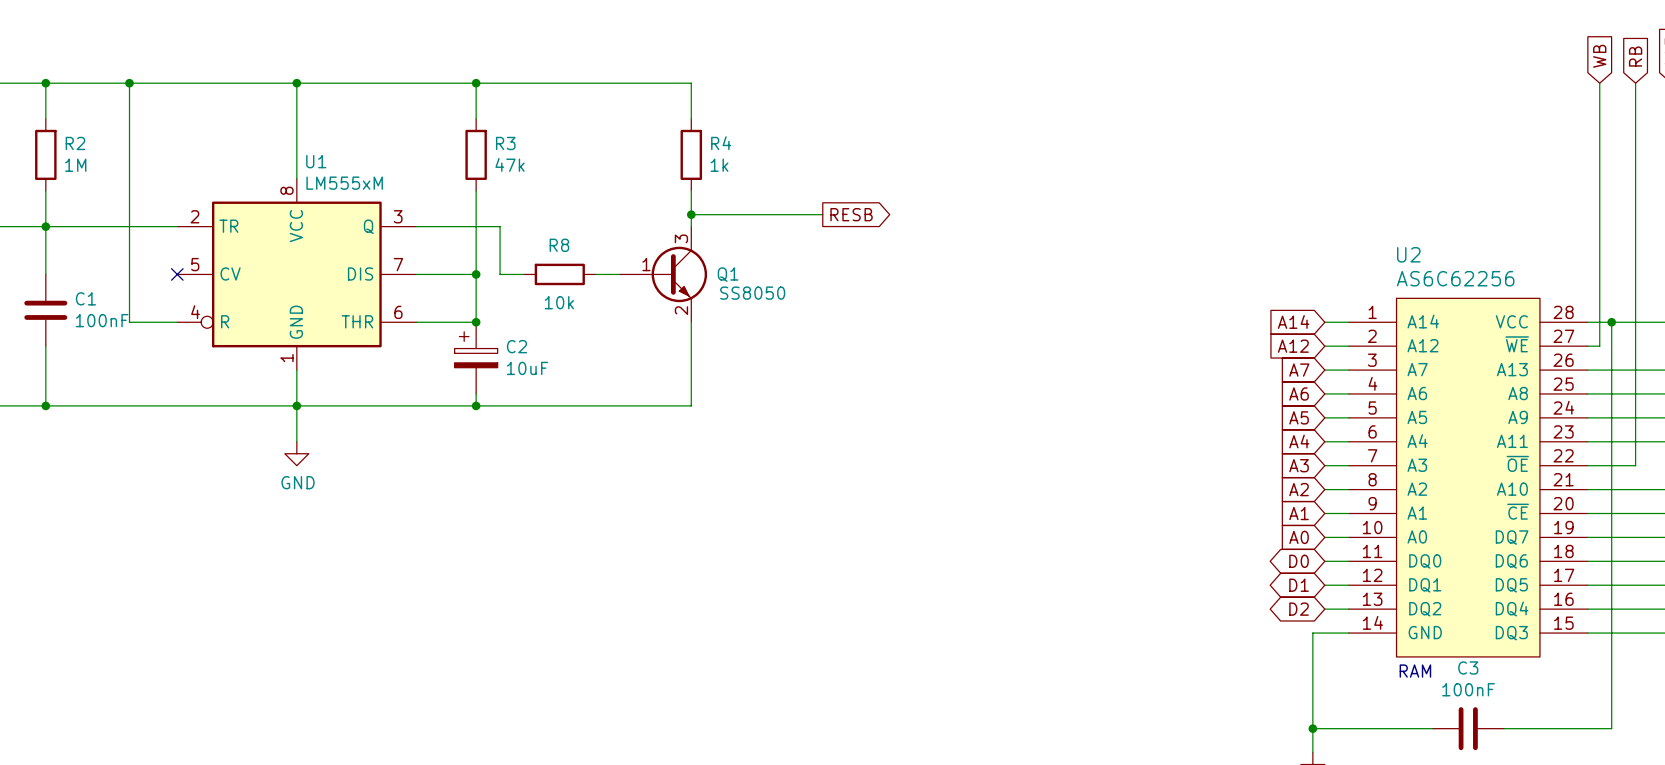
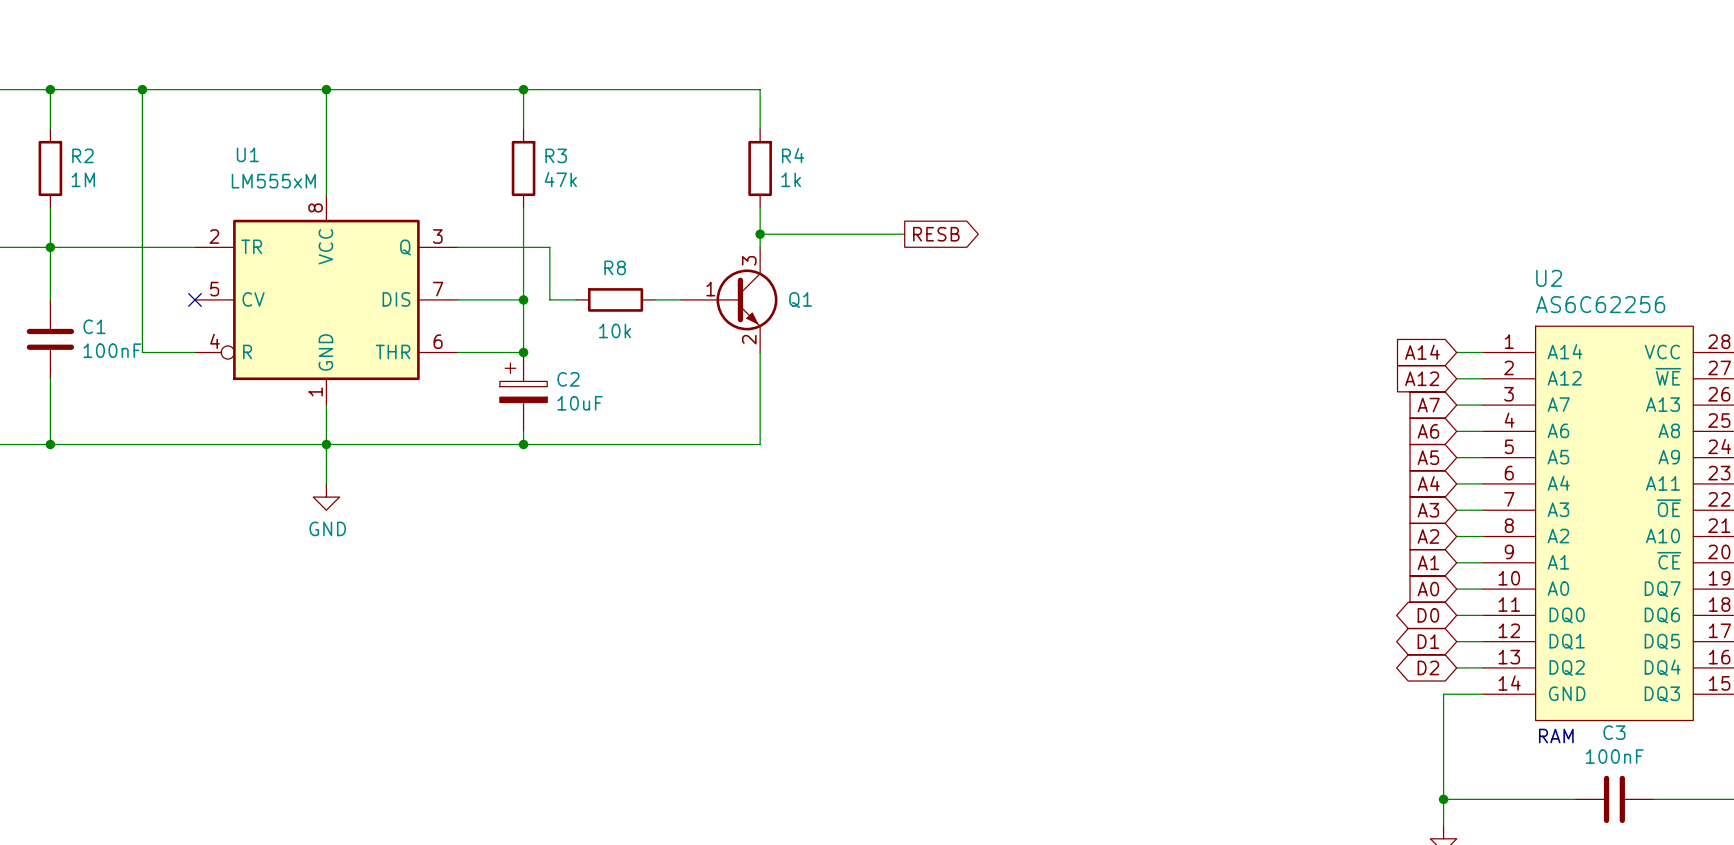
U1 name position: U1 (316, 161) -> U1 (247, 154)
U1 value position: LM555xM (344, 183) -> LM555xM (273, 181)
Q1 value: SS8050 (752, 293) -> none

